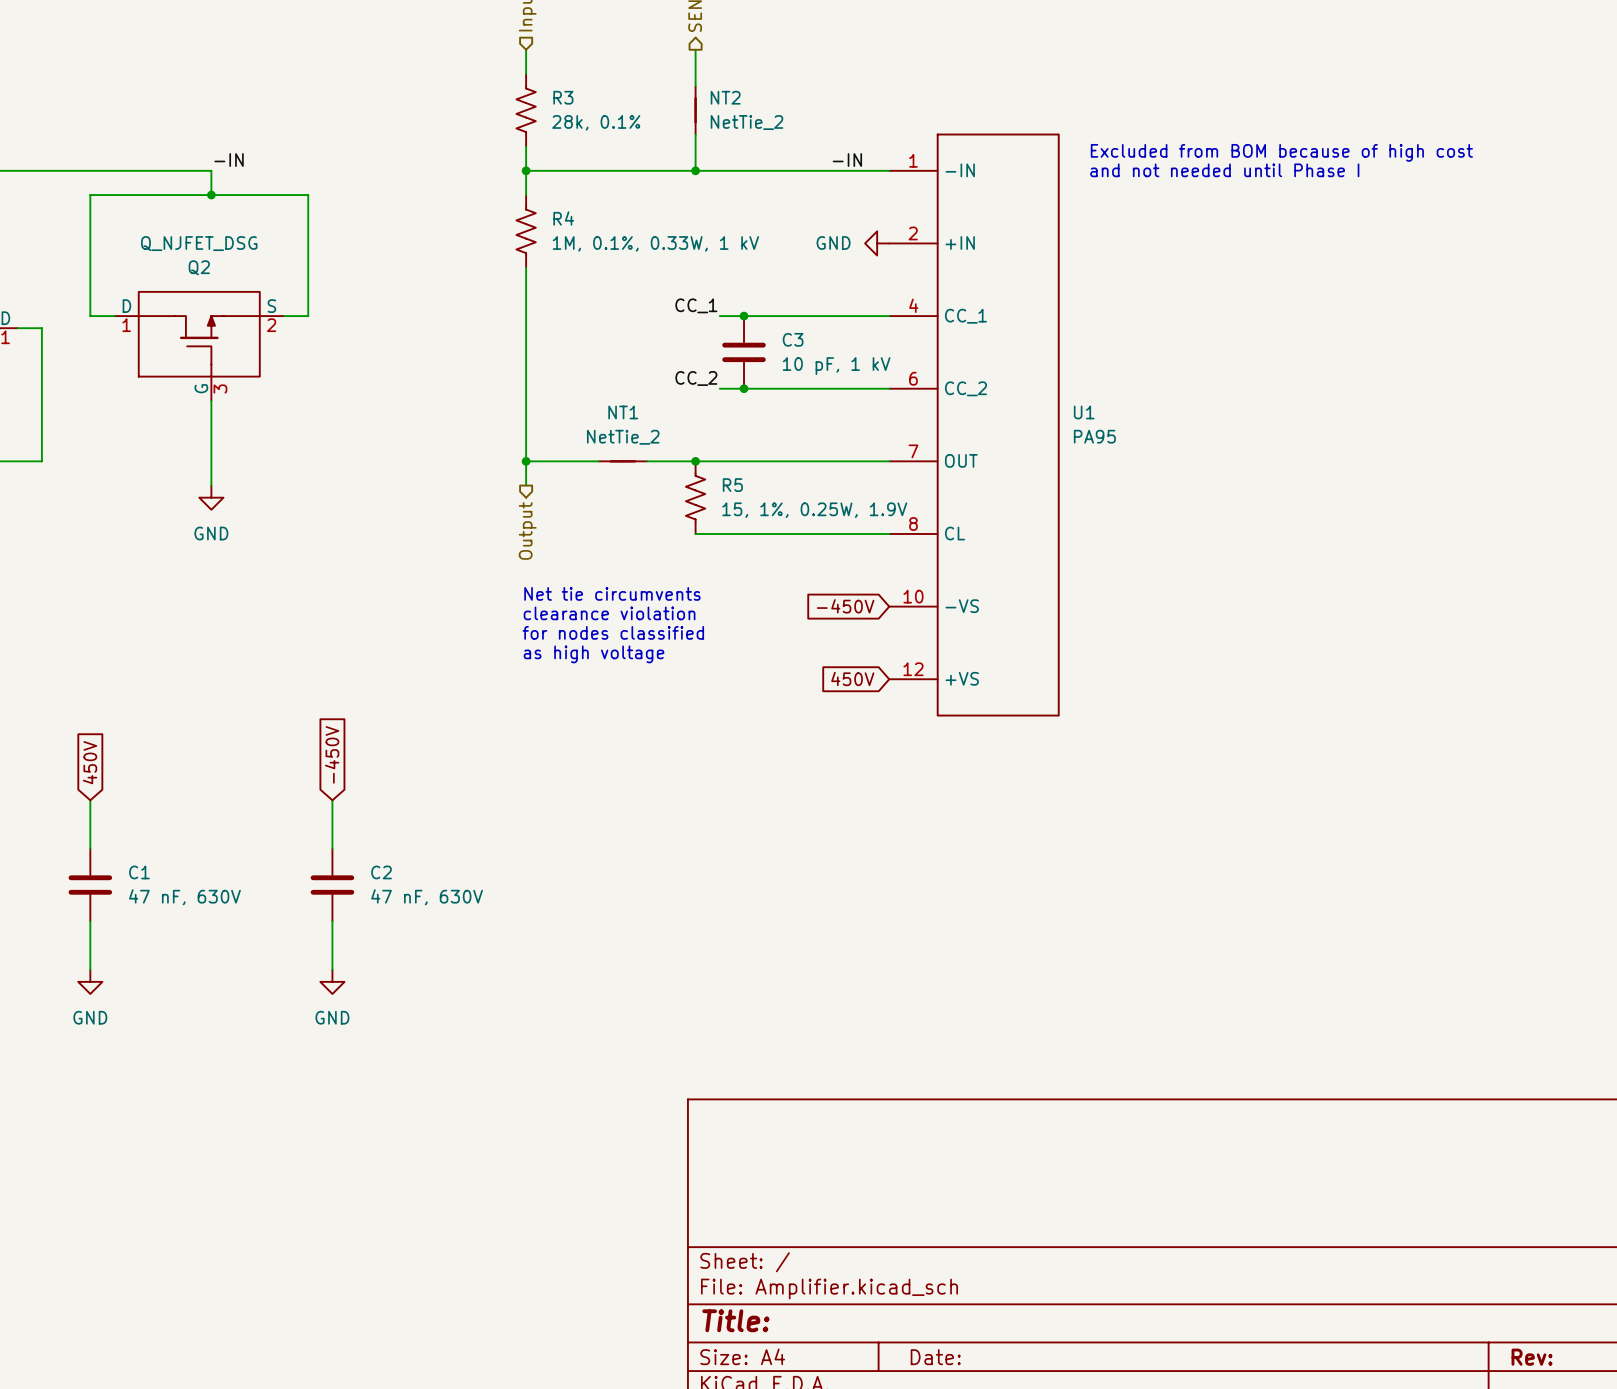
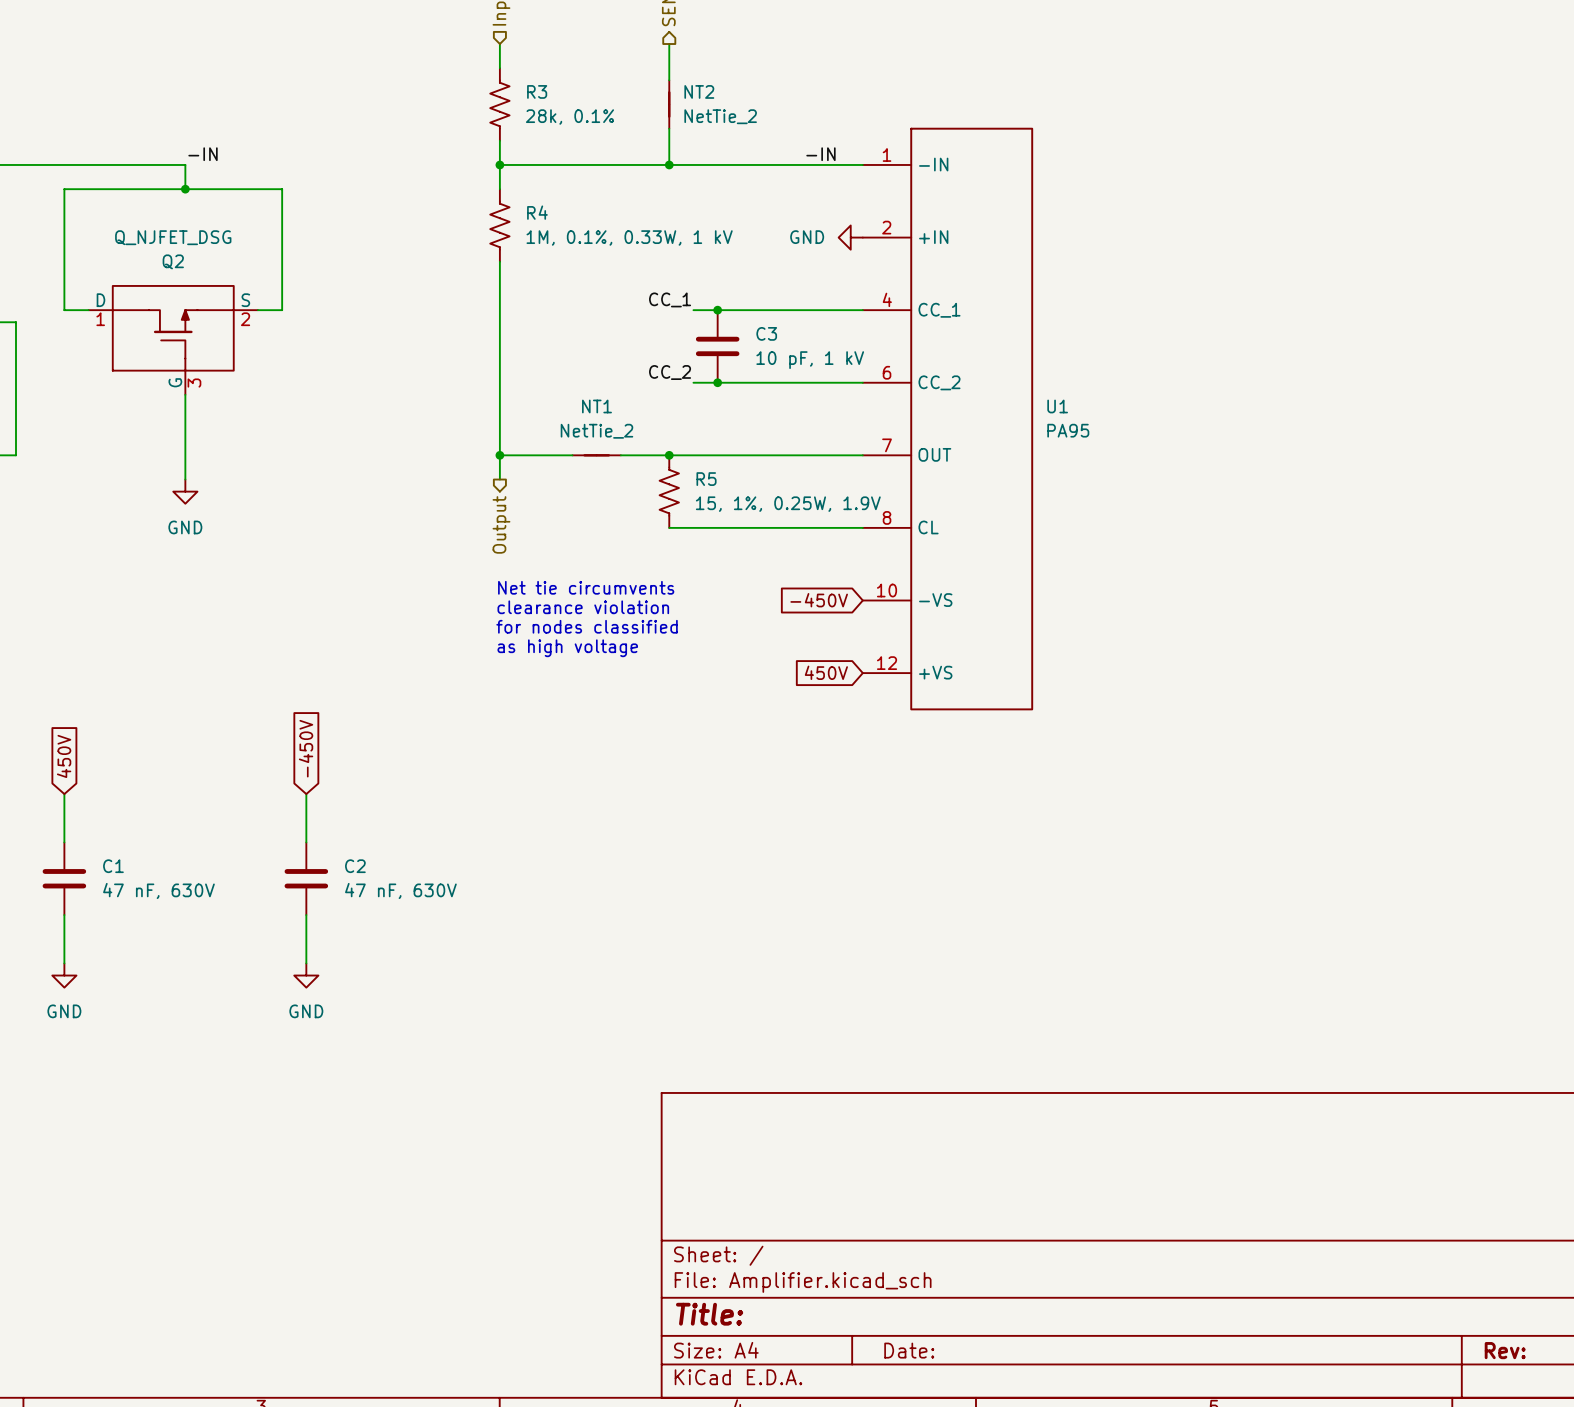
text: Excluded from BOM because of high cost (1281, 152) -> none
text: and not needed until Phase I (1224, 170) -> none

